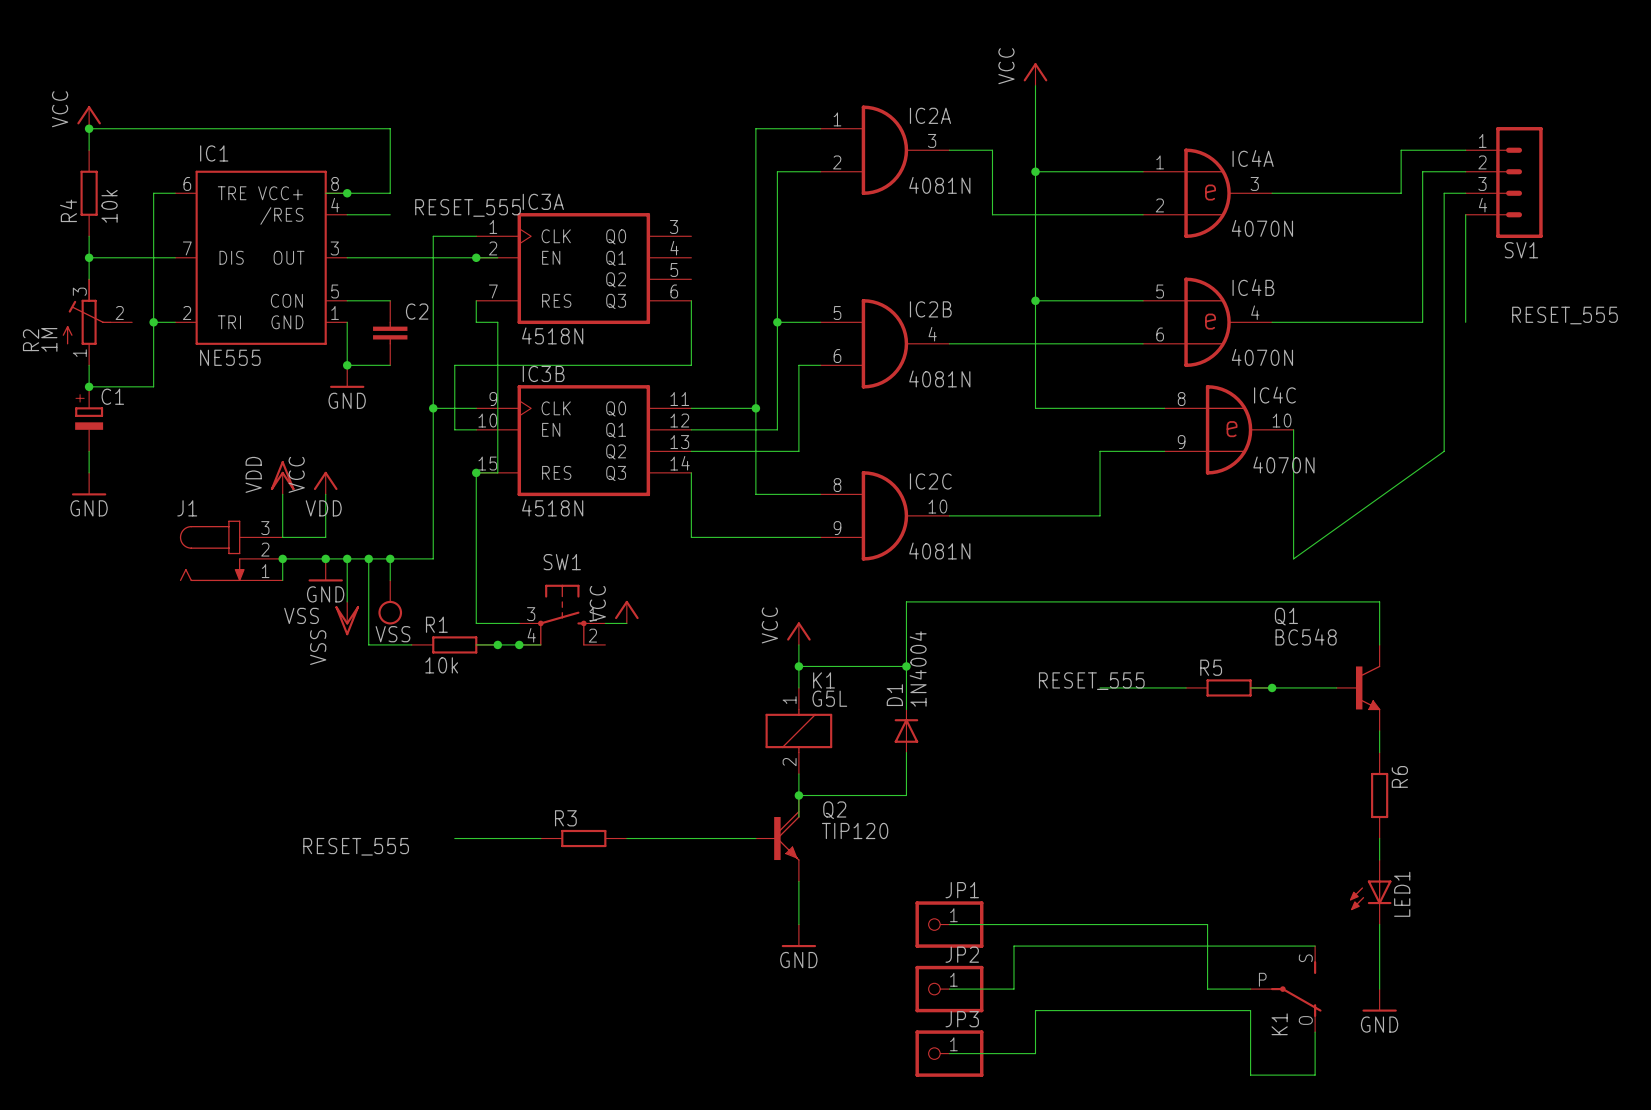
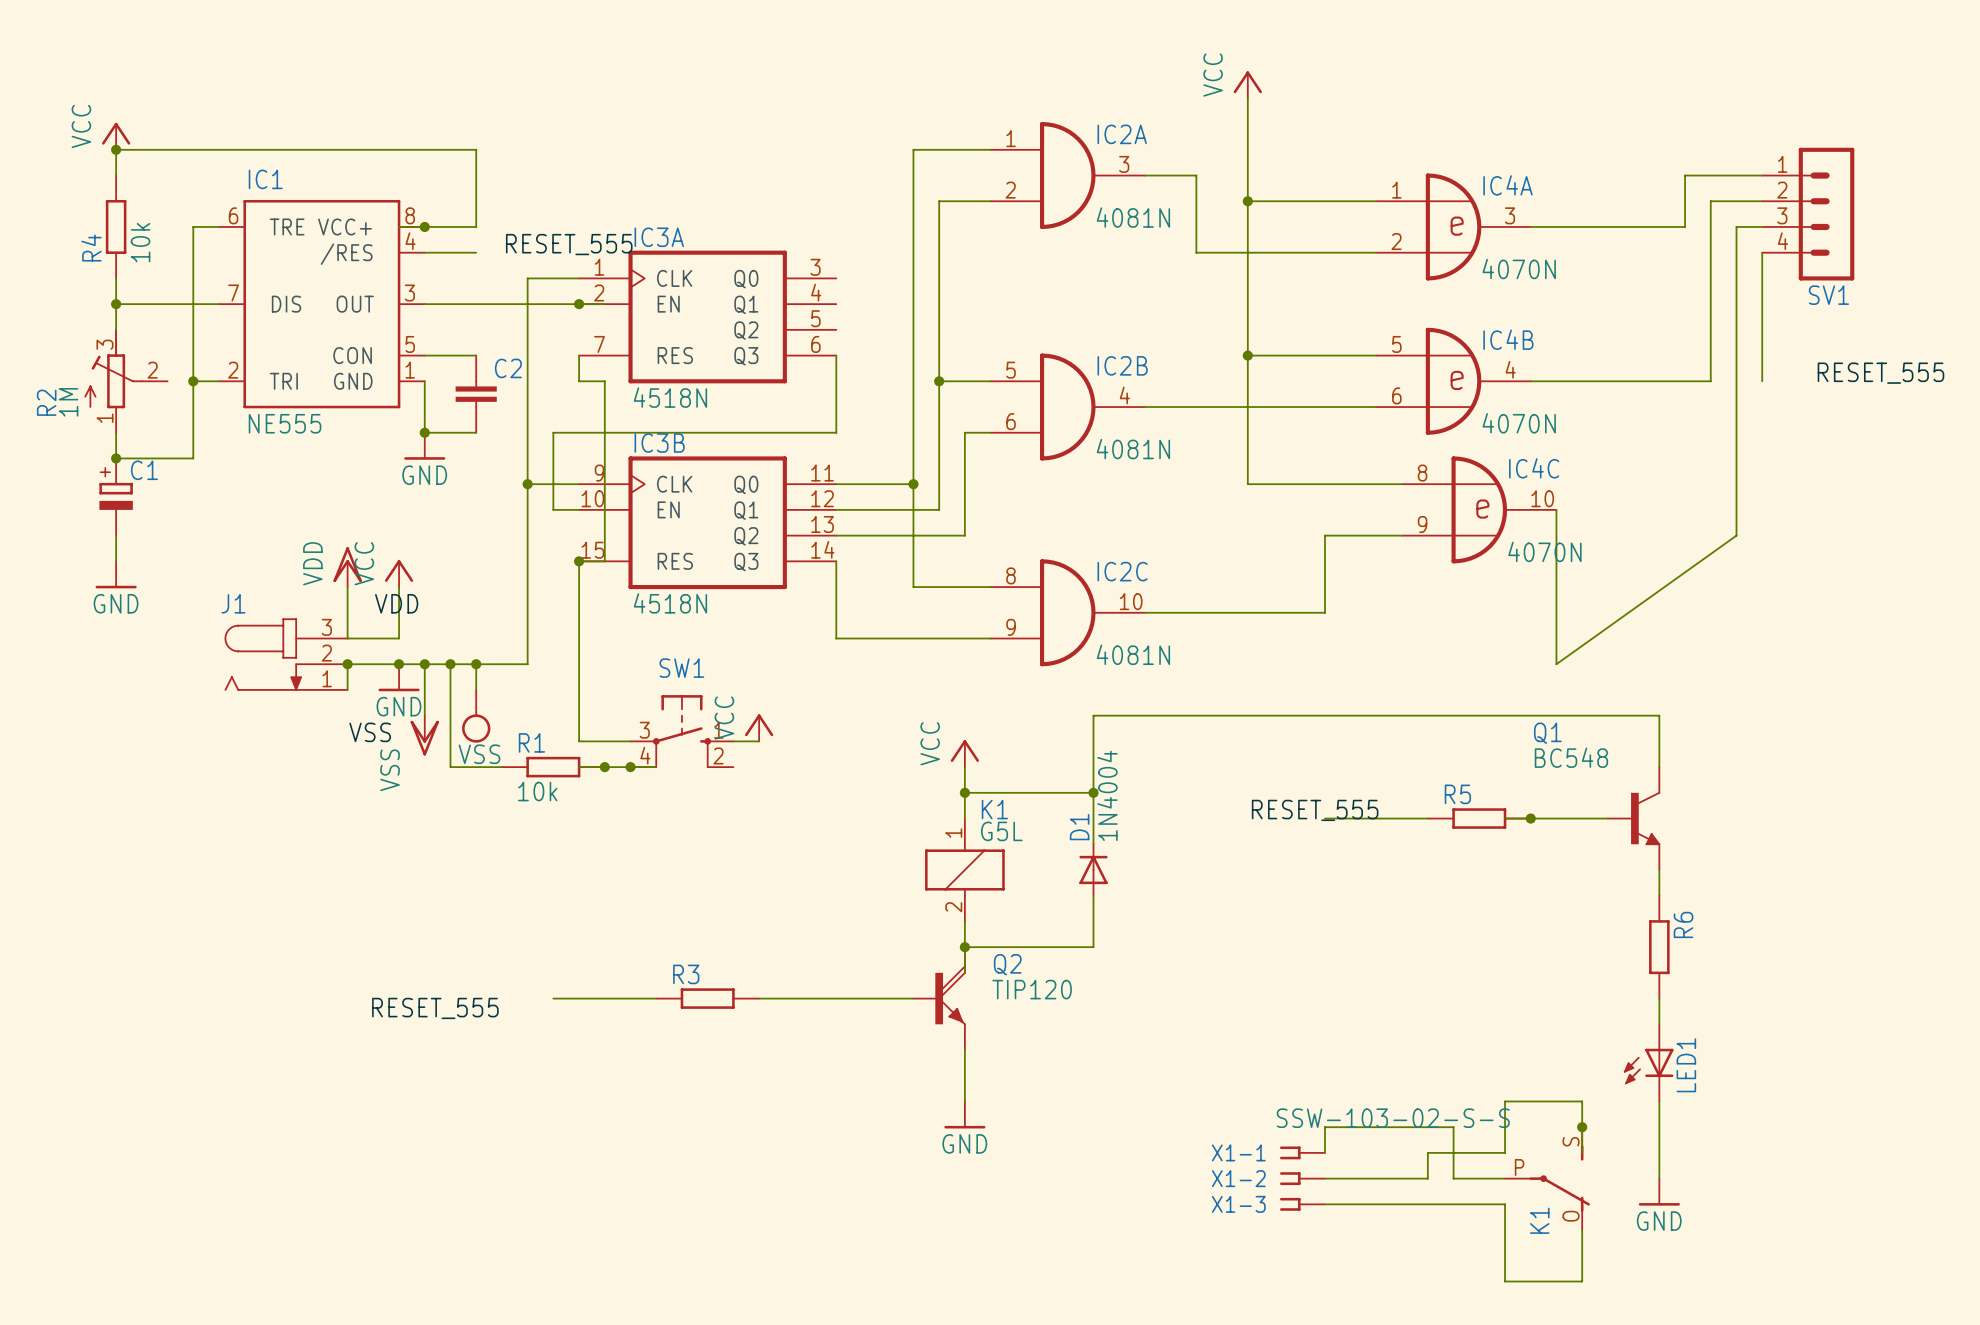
wire: (949, 924) (1207, 924) (1207, 946) (1315, 946) -> none
JP1: (949, 924) -> none
wire: (1100, 946) (1013, 946) (1013, 989) (949, 989) -> (1324, 1127) (1324, 1152)
junction: none -> (1582, 1127)
X1-1: none -> SSW-103-02-S-S (1302, 1152)
wire: none -> (1582, 1152) (1582, 1101) (1505, 1101) (1505, 1152) (1427, 1152) (1427, 1178) (1324, 1178)
JP2: (949, 989) -> none
X1-2: none -> (1302, 1178)
X1-3: none -> (1302, 1204)
wire: (1100, 1010) (1035, 1010) (1035, 1053) (949, 1053) -> none
JP3: (949, 1053) -> none

